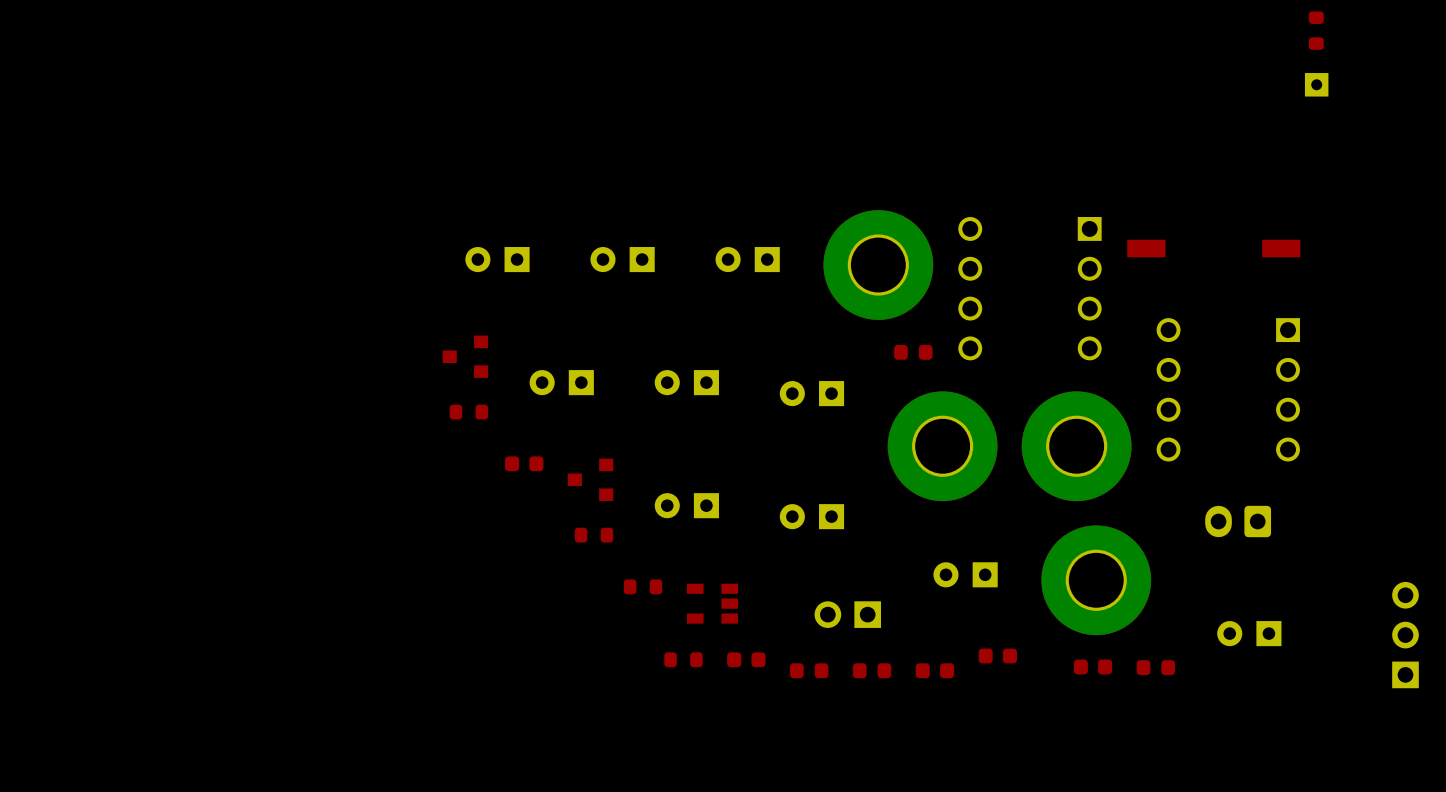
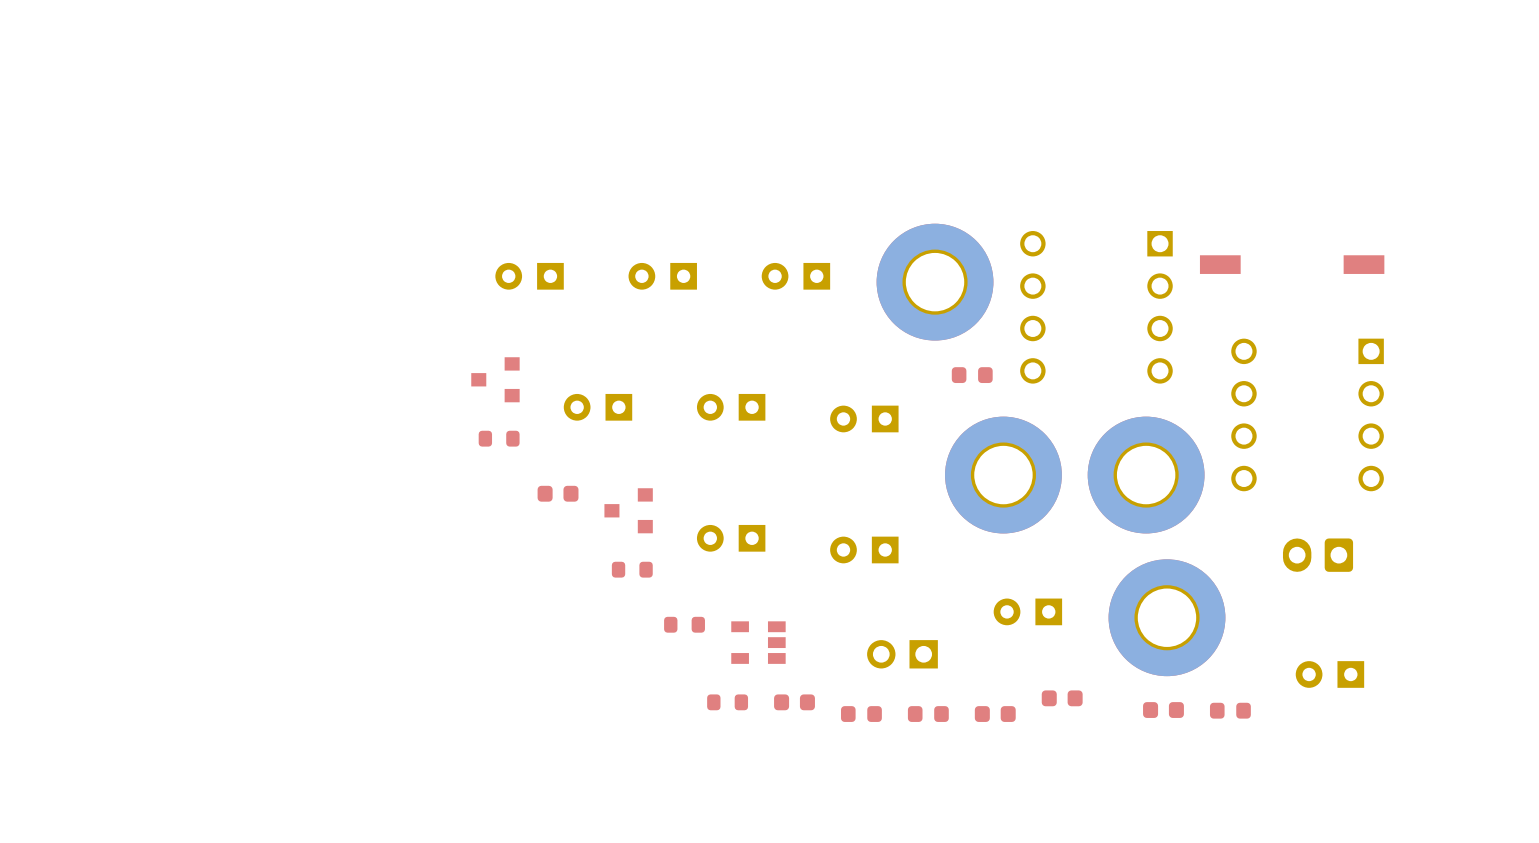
part: (1316, 30) -> none
part: (1316, 84) -> none
part: (1405, 635) -> none

